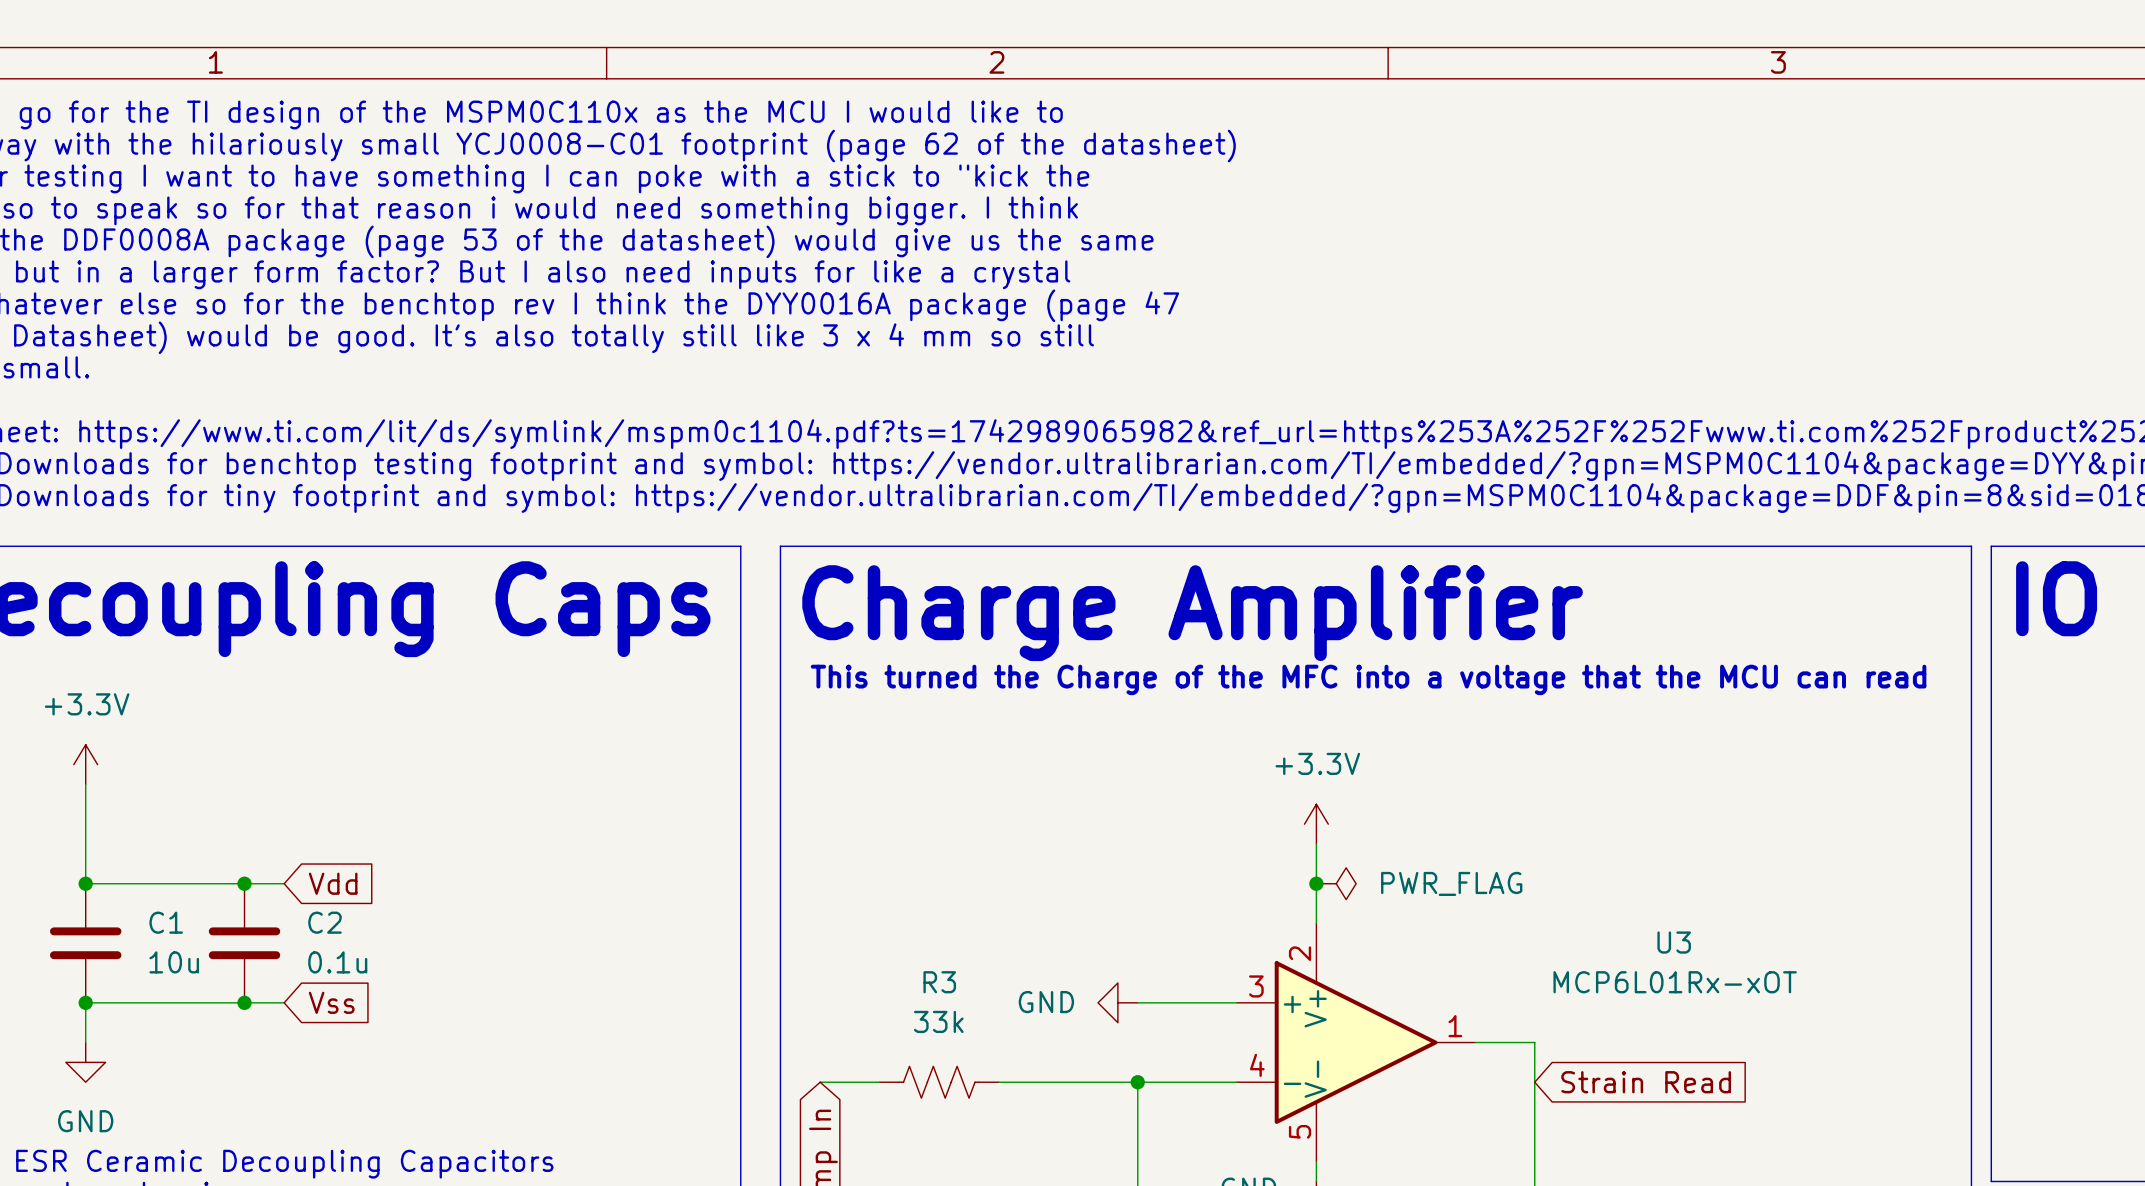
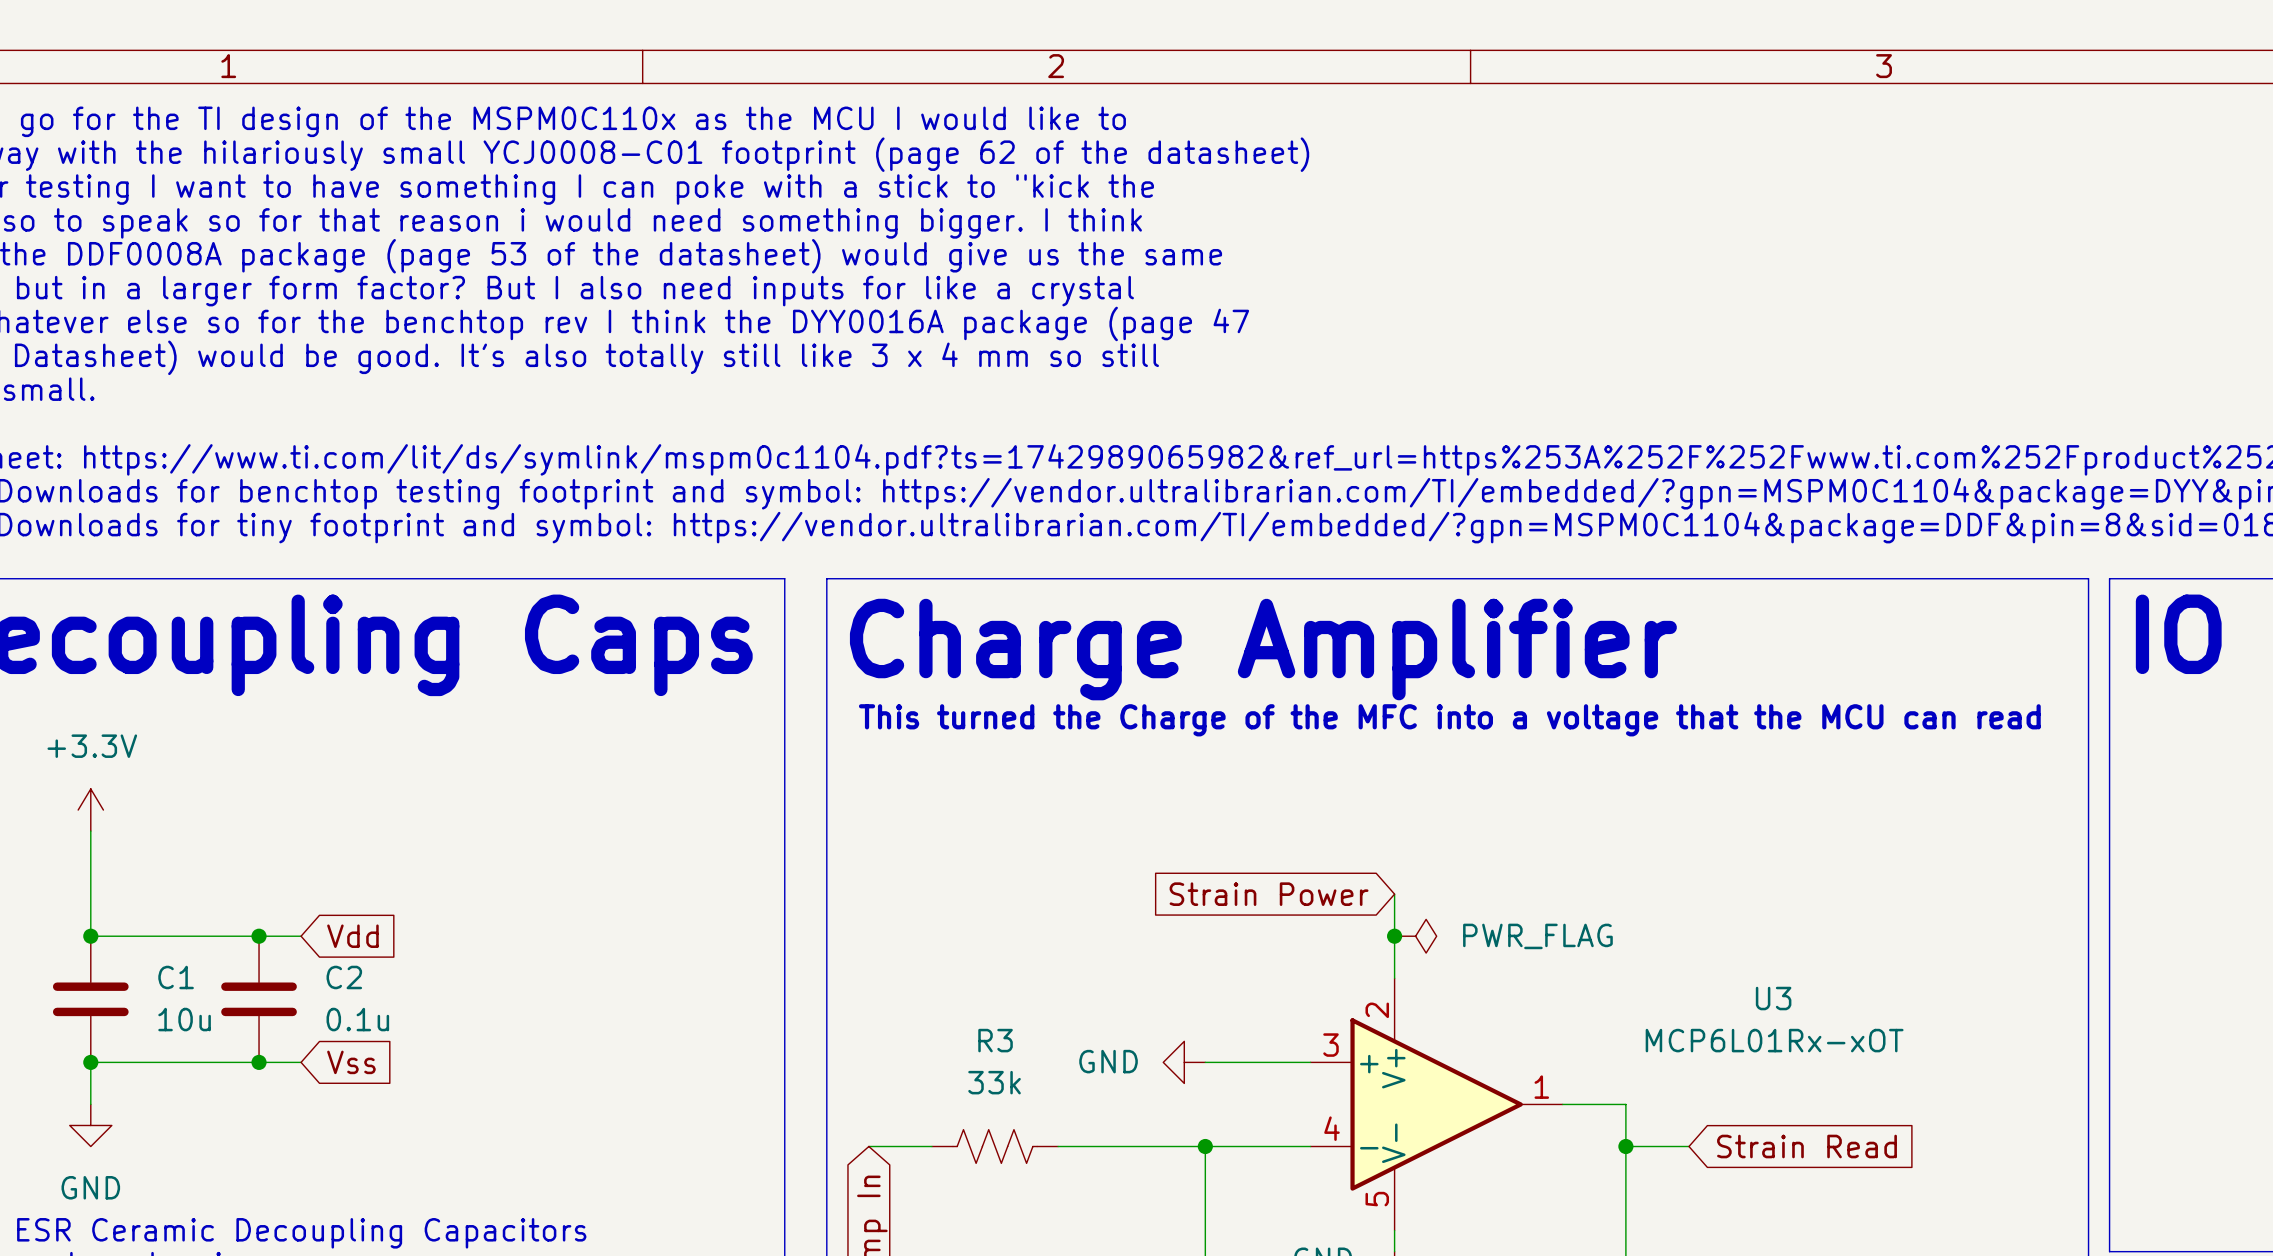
power symbol: +3.3V (1316, 824) -> none
global label: none -> Strain Power (1269, 894)
wire: none -> (1625, 1146) (1688, 1146)
junction: none -> (1625, 1146)
global label position: Strain Read (1646, 1082) -> Strain Read (1807, 1146)

